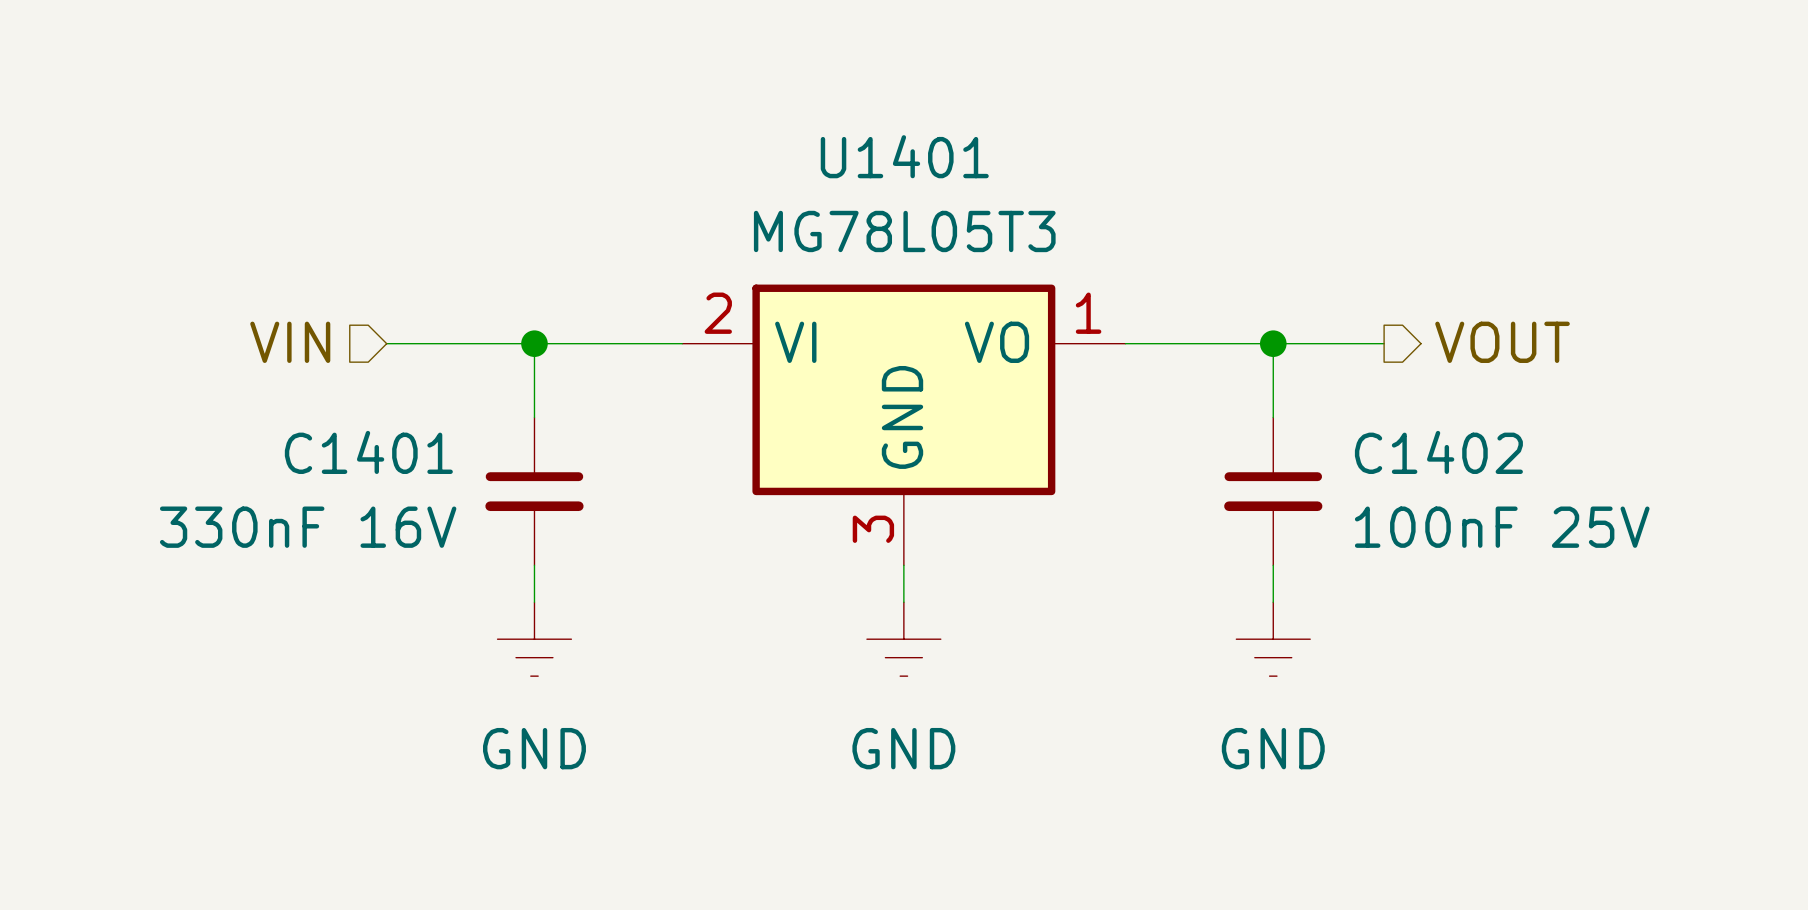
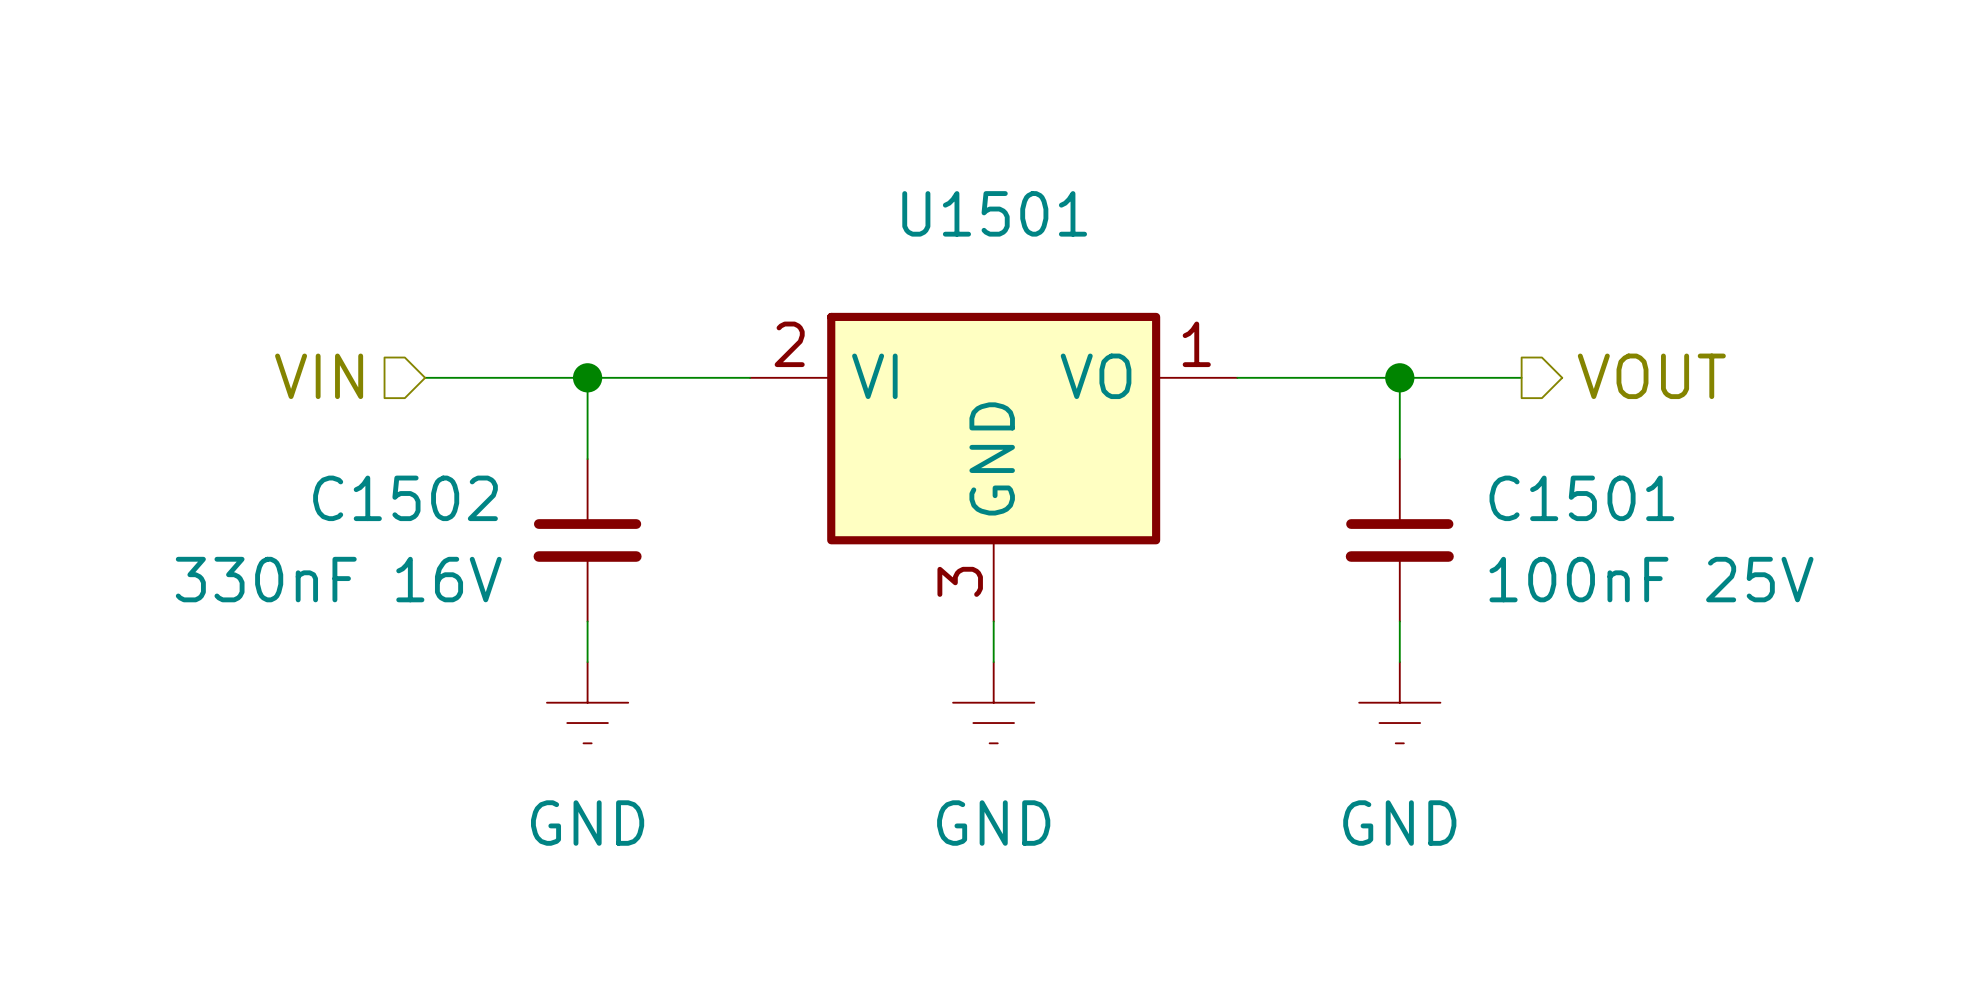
U1401 name: U1401 (904, 156) -> U1501 (994, 213)
U1401 value: MG78L05T3 (904, 231) -> none
C1401 name: C1401 (368, 452) -> C1502 (405, 498)
C1402 name: C1402 (1438, 452) -> C1501 (1581, 498)

